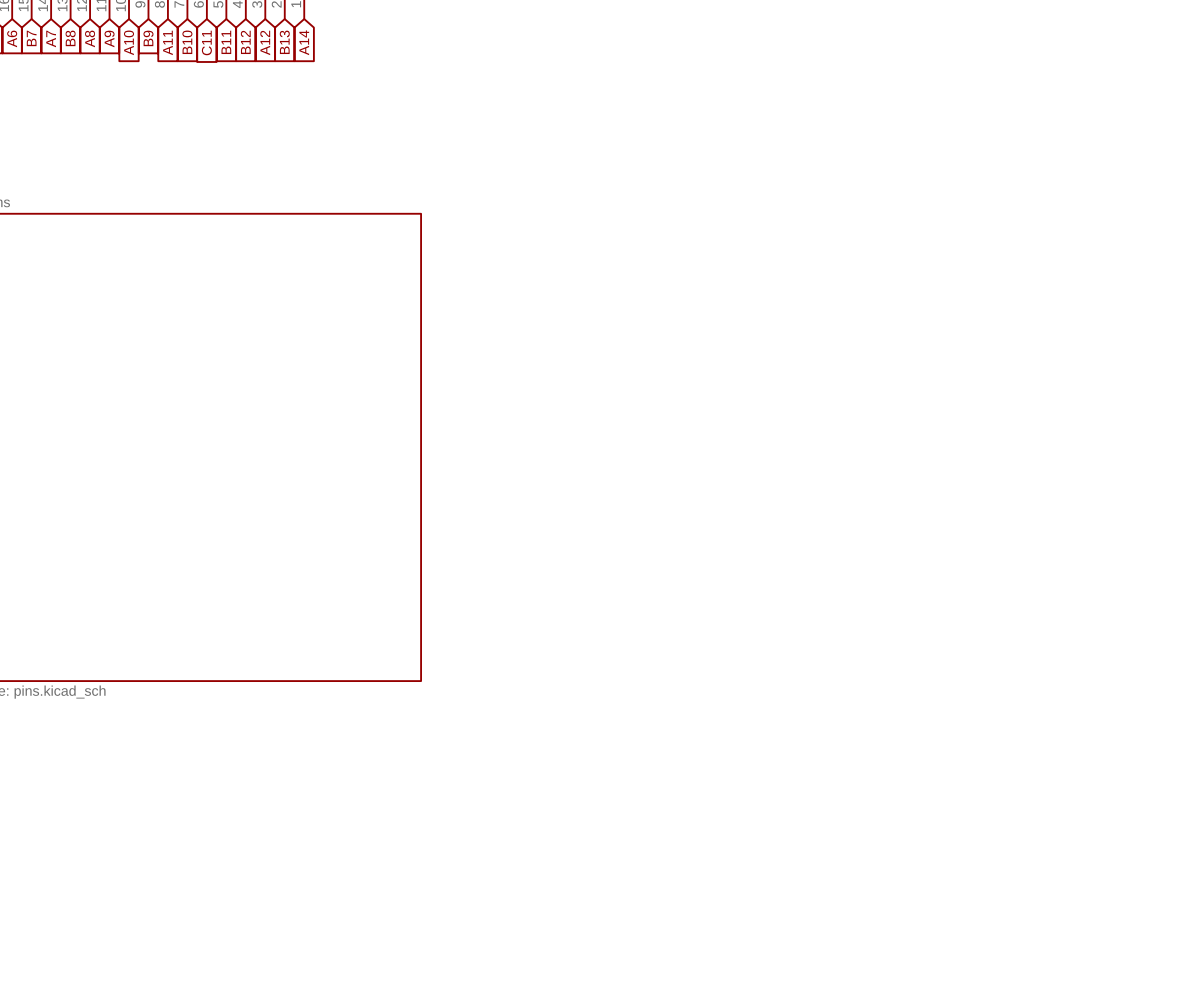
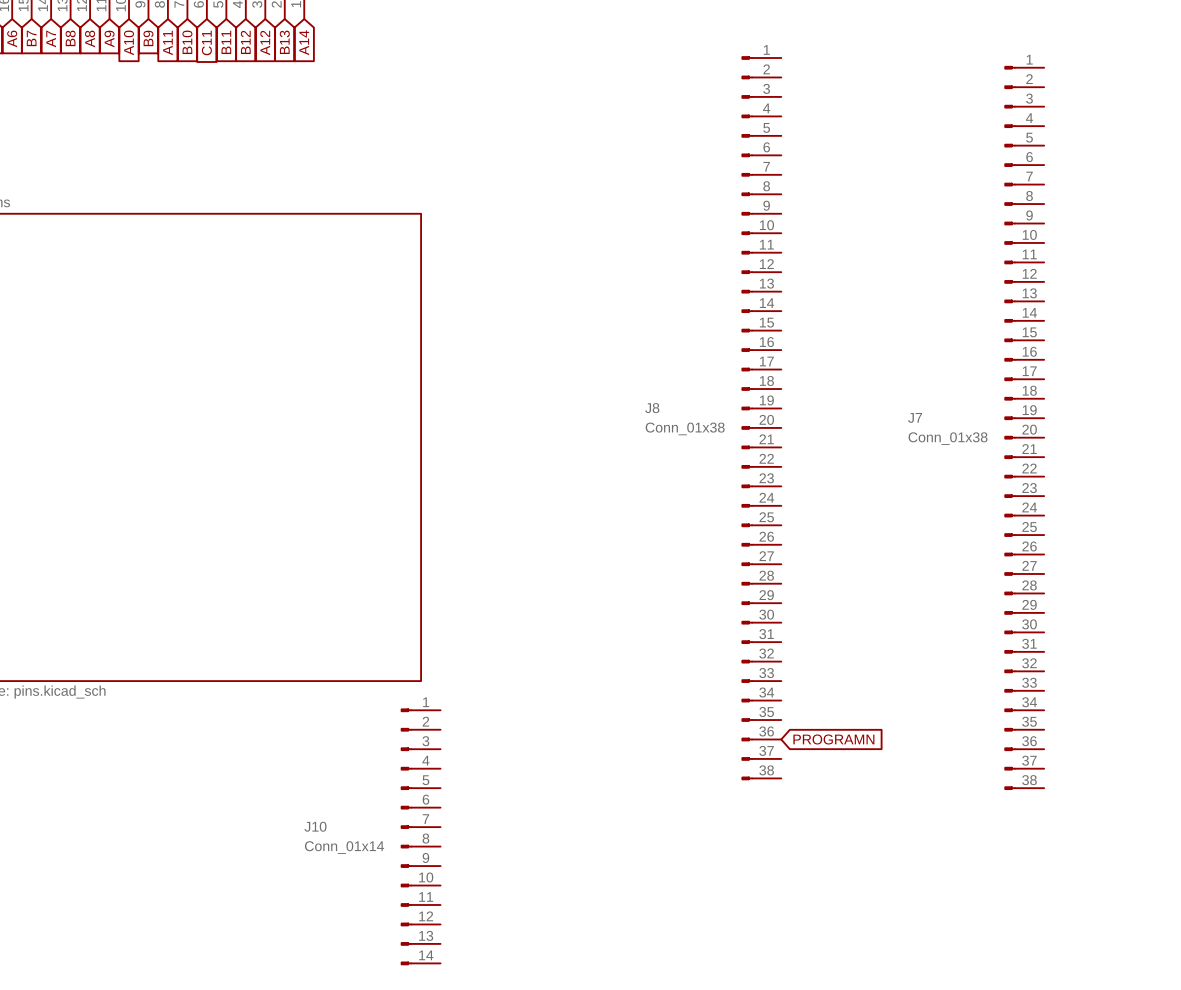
J8: none -> Conn_01x38 (761, 418)
J7: none -> Conn_01x38 (1024, 427)
global label: none -> PROGRAMN (833, 739)
J10: none -> Conn_01x14 (420, 836)

